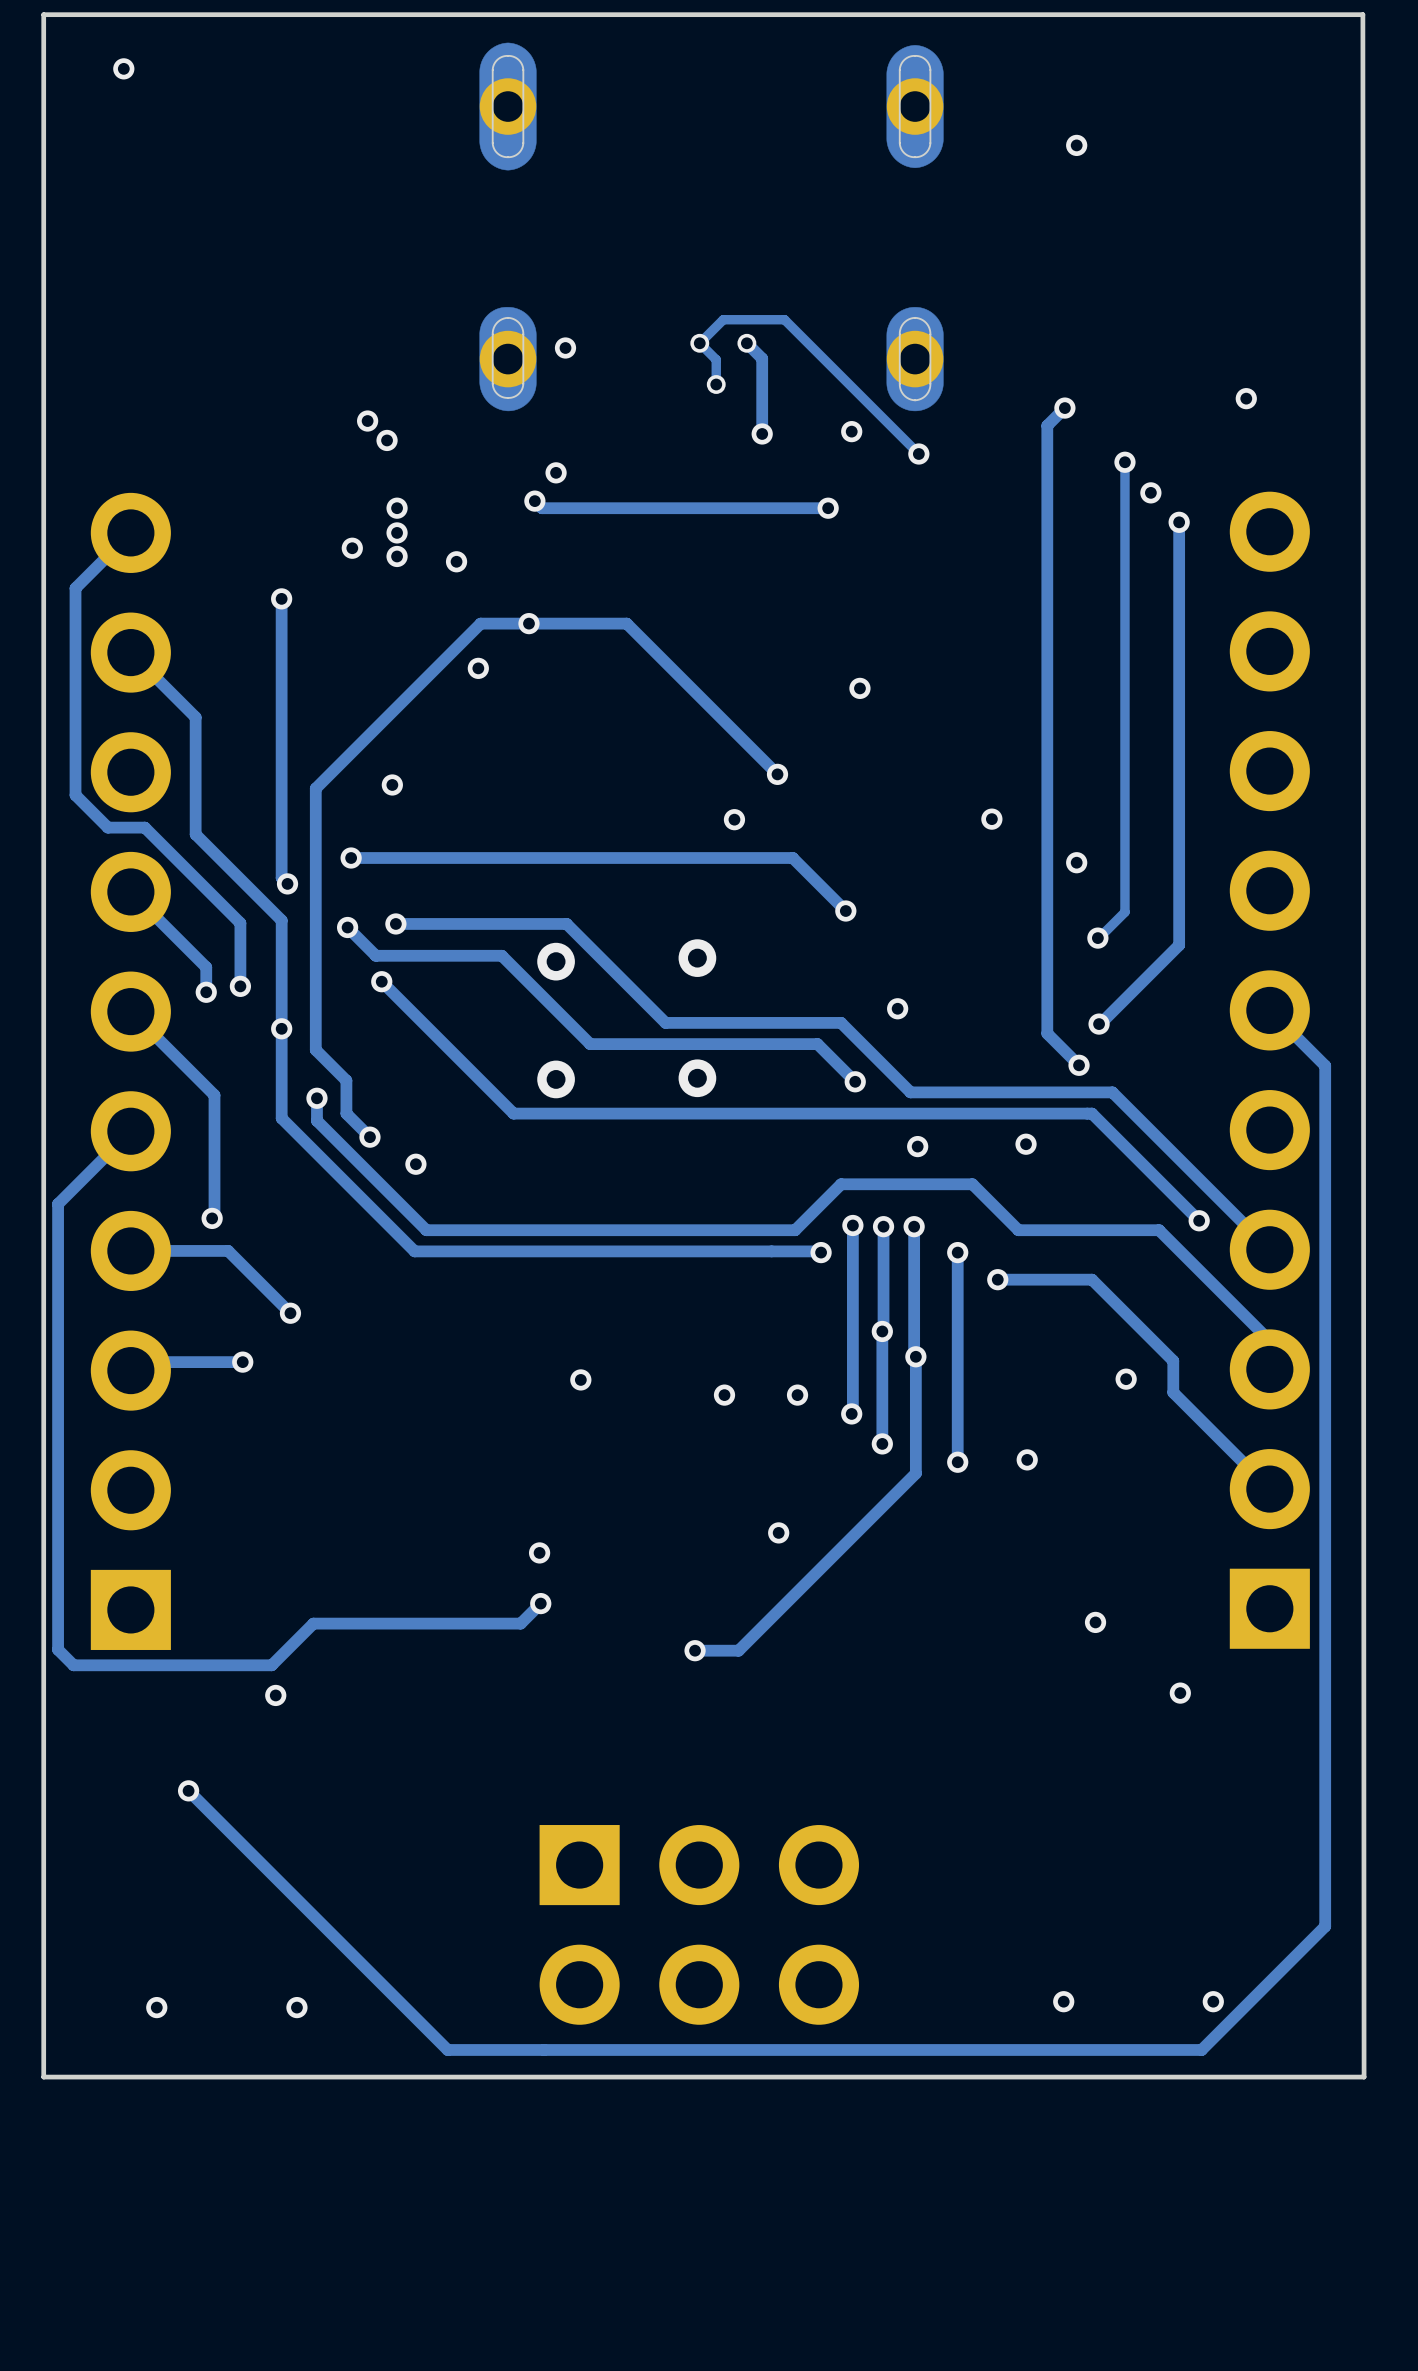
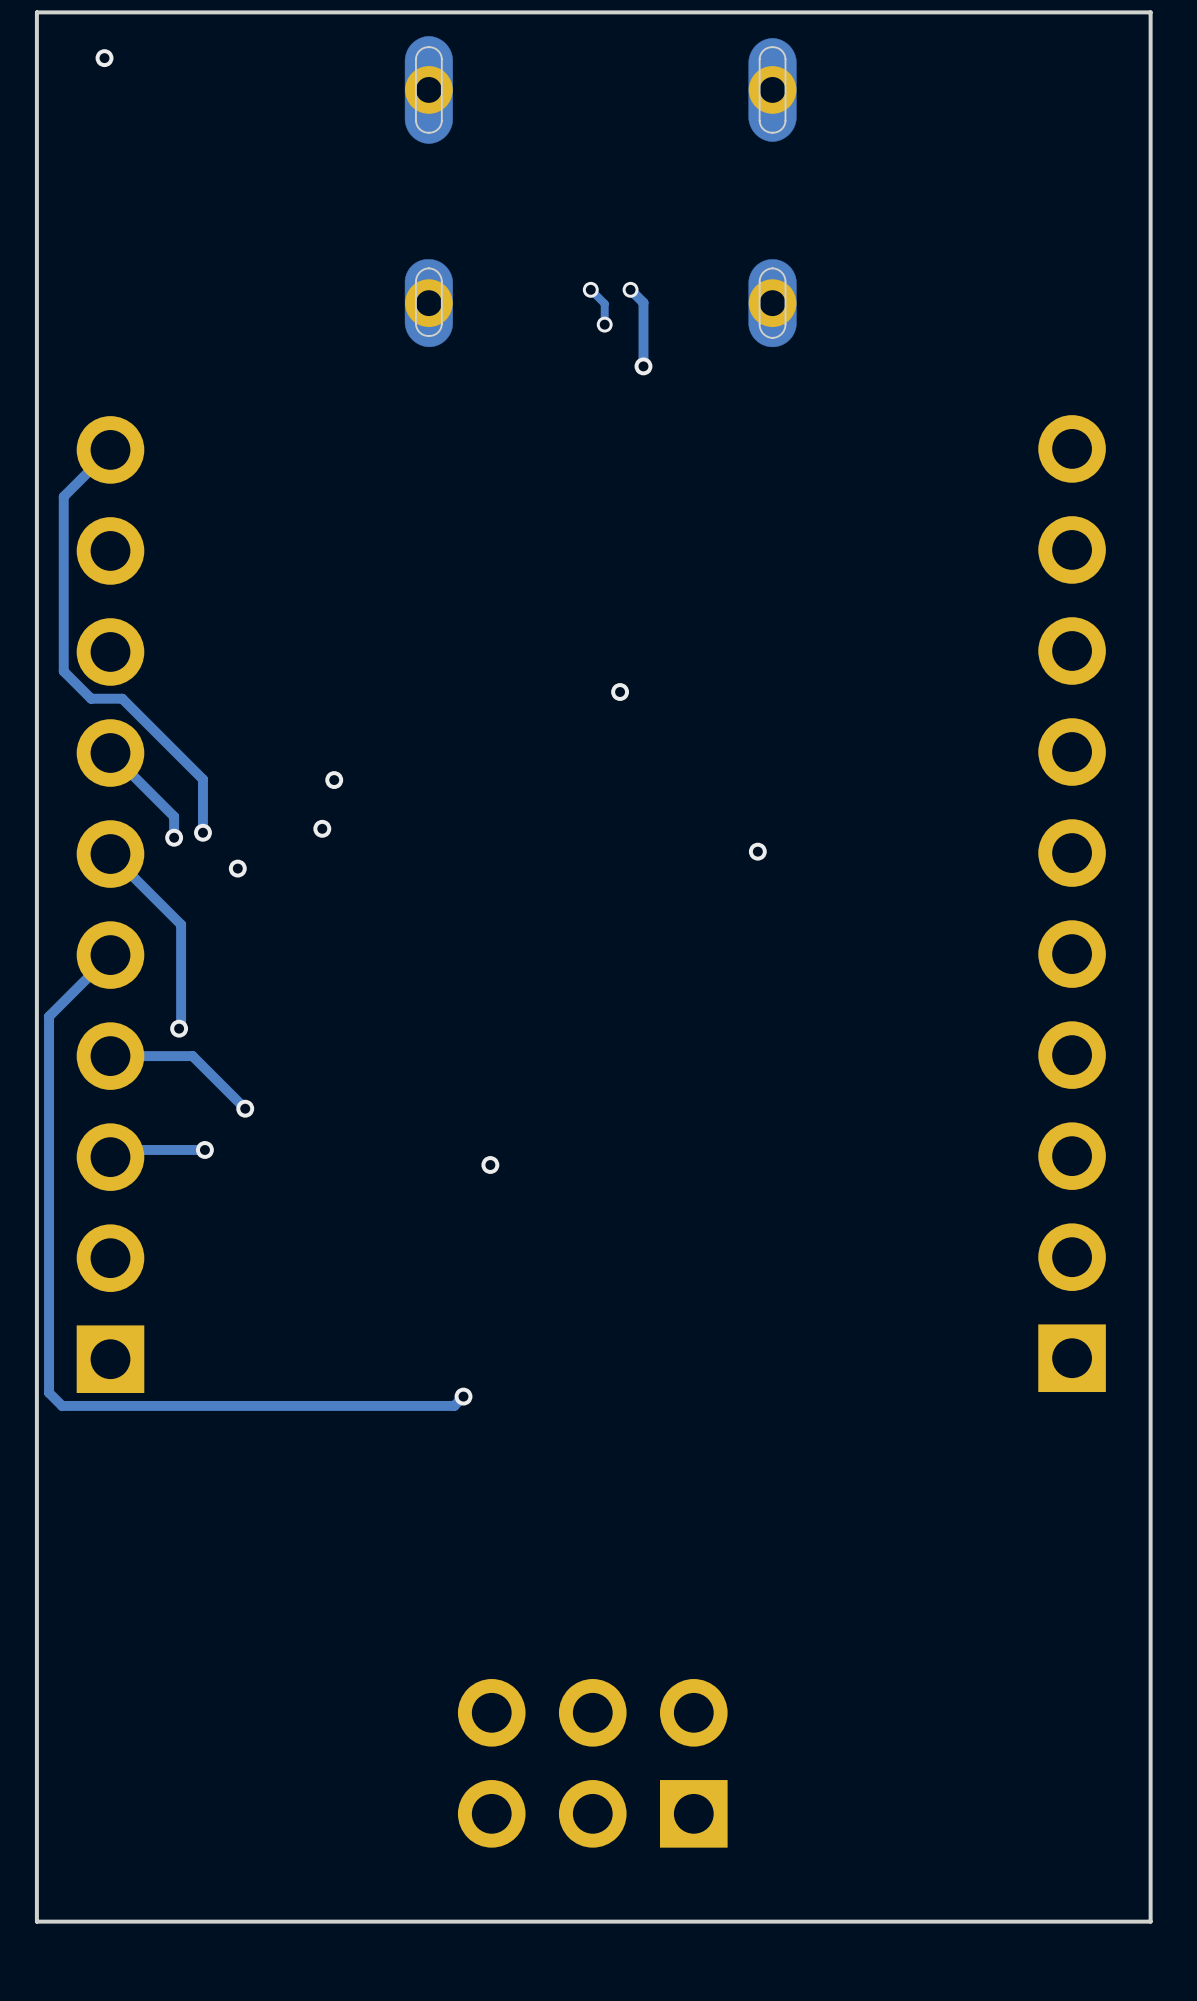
board edge: (1362, 14) (1364, 2077) (43, 2077) -> (1150, 12) (1150, 1921) (36, 1921) (36, 1753)
via: (1076, 145) -> none
track: (699, 343) (723, 319) (784, 319) (918, 454) -> none
via: (565, 347) -> none
via: (1246, 398) -> none
track: (1064, 408) (1047, 425) (1047, 1033) (1079, 1065) -> none
via: (1064, 408) -> none
via: (367, 421) -> none
via: (851, 431) -> none
via: (387, 440) -> none
via: (918, 454) -> none
track: (1124, 458) (1124, 912) (1099, 938) -> none
via: (1124, 462) -> none
via: (556, 472) -> none
via: (1150, 492) -> none
track: (534, 501) (541, 508) (828, 508) -> none
via: (534, 501) -> none
via: (397, 508) -> none
via: (828, 508) -> none
track: (1179, 521) (1179, 945) (1100, 1024) -> none
via: (1179, 522) -> none
via: (397, 532) -> none
via: (352, 548) -> none
via: (397, 556) -> none
via: (456, 561) -> none
track: (281, 598) (281, 878) (287, 883) -> none
via: (281, 598) -> none
via: (528, 623) -> none
track: (130, 652) (195, 717) (195, 834) (281, 920) (281, 1118) (414, 1251) (821, 1252) -> none
via: (478, 668) -> none
via: (859, 688) -> none
track: (777, 774) (626, 623) (480, 623) (315, 788) (315, 1049) (346, 1080) (346, 1113) (369, 1137) -> none
via: (777, 774) -> none
via: (392, 784) -> none
via: (991, 819) -> none
track: (351, 858) (792, 858) (845, 911) -> none
via: (351, 858) -> none
via: (1076, 862) -> none
via: (287, 883) -> none
via: (845, 911) -> none
track: (395, 923) (566, 923) (665, 1022) (841, 1022) (910, 1092) (1112, 1092) (1269, 1249) -> none
track: (347, 927) (375, 955) (501, 955) (590, 1044) (817, 1044) (855, 1081) -> none
via: (347, 927) -> none
via: (1097, 938) -> none
via: (697, 958) -> none
via: (556, 961) -> none
track: (381, 981) (513, 1113) (1091, 1113) (1199, 1220) -> none
track: (1269, 1010) (1325, 1065) (1325, 1926) (1201, 2049) (447, 2049) (188, 1790) -> none
via: (1099, 1024) -> none
via: (1079, 1065) -> none
via: (697, 1078) -> none
via: (556, 1079) -> none
via: (855, 1081) -> none
track: (316, 1098) (316, 1120) (426, 1230) (795, 1230) (841, 1184) (972, 1184) (1018, 1230) (1159, 1230) (1269, 1340) (1269, 1369) -> none
via: (316, 1098) -> none
via: (369, 1137) -> none
via: (1026, 1144) -> none
via: (917, 1146) -> none
via: (415, 1164) -> none
via: (1199, 1220) -> none
track: (852, 1225) (851, 1413) -> none
via: (852, 1225) -> none
track: (883, 1226) (882, 1443) -> none
via: (883, 1226) -> none
track: (914, 1226) (915, 1473) (738, 1650) (695, 1650) -> none
via: (914, 1226) -> none
via: (821, 1252) -> none
track: (957, 1252) (957, 1462) -> none
via: (957, 1252) -> none
track: (997, 1279) (1092, 1279) (1173, 1360) (1173, 1392) (1269, 1489) -> none
via: (997, 1279) -> none
via: (882, 1331) -> none
via: (915, 1356) -> none
via: (1126, 1379) -> none
via: (724, 1395) -> none
via: (797, 1395) -> none
via: (851, 1413) -> none
via: (882, 1443) -> none
via: (1027, 1459) -> none
via: (957, 1462) -> none
via: (778, 1532) -> none
via: (539, 1552) -> none
track: (540, 1603) (520, 1623) (313, 1623) (271, 1665) -> (463, 1396) (454, 1405) (229, 1405)
via: (540, 1603) -> none
via: (1095, 1622) -> none
via: (695, 1650) -> none
via: none -> (463, 1396)
via: (1180, 1693) -> none
via: (275, 1695) -> none
via: (188, 1790) -> none
part rotation: 0° (699, 1924) -> 180° (592, 1763)
via: (1063, 2001) -> none
via: (1213, 2001) -> none
via: (156, 2007) -> none
via: (296, 2007) -> none

